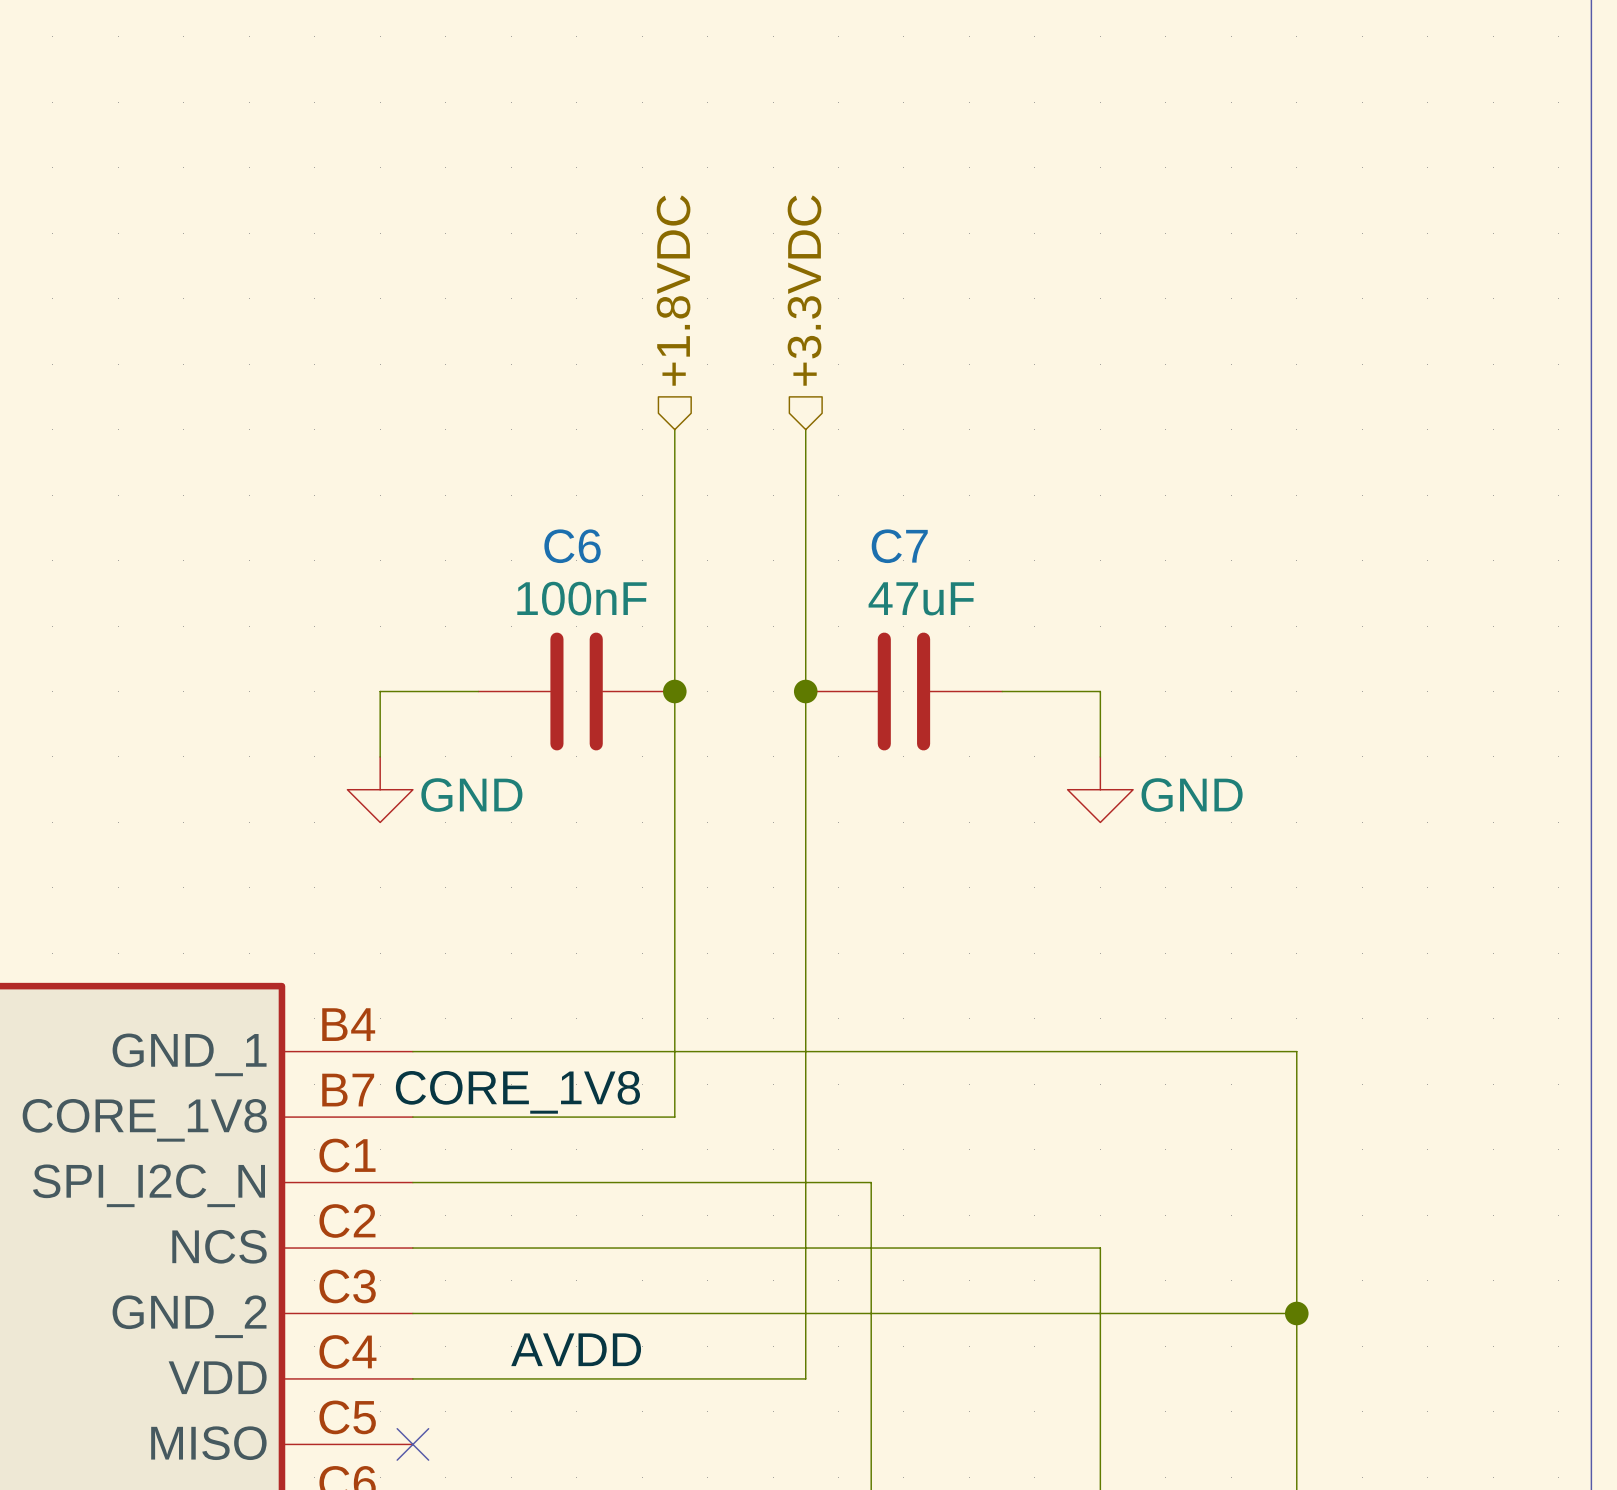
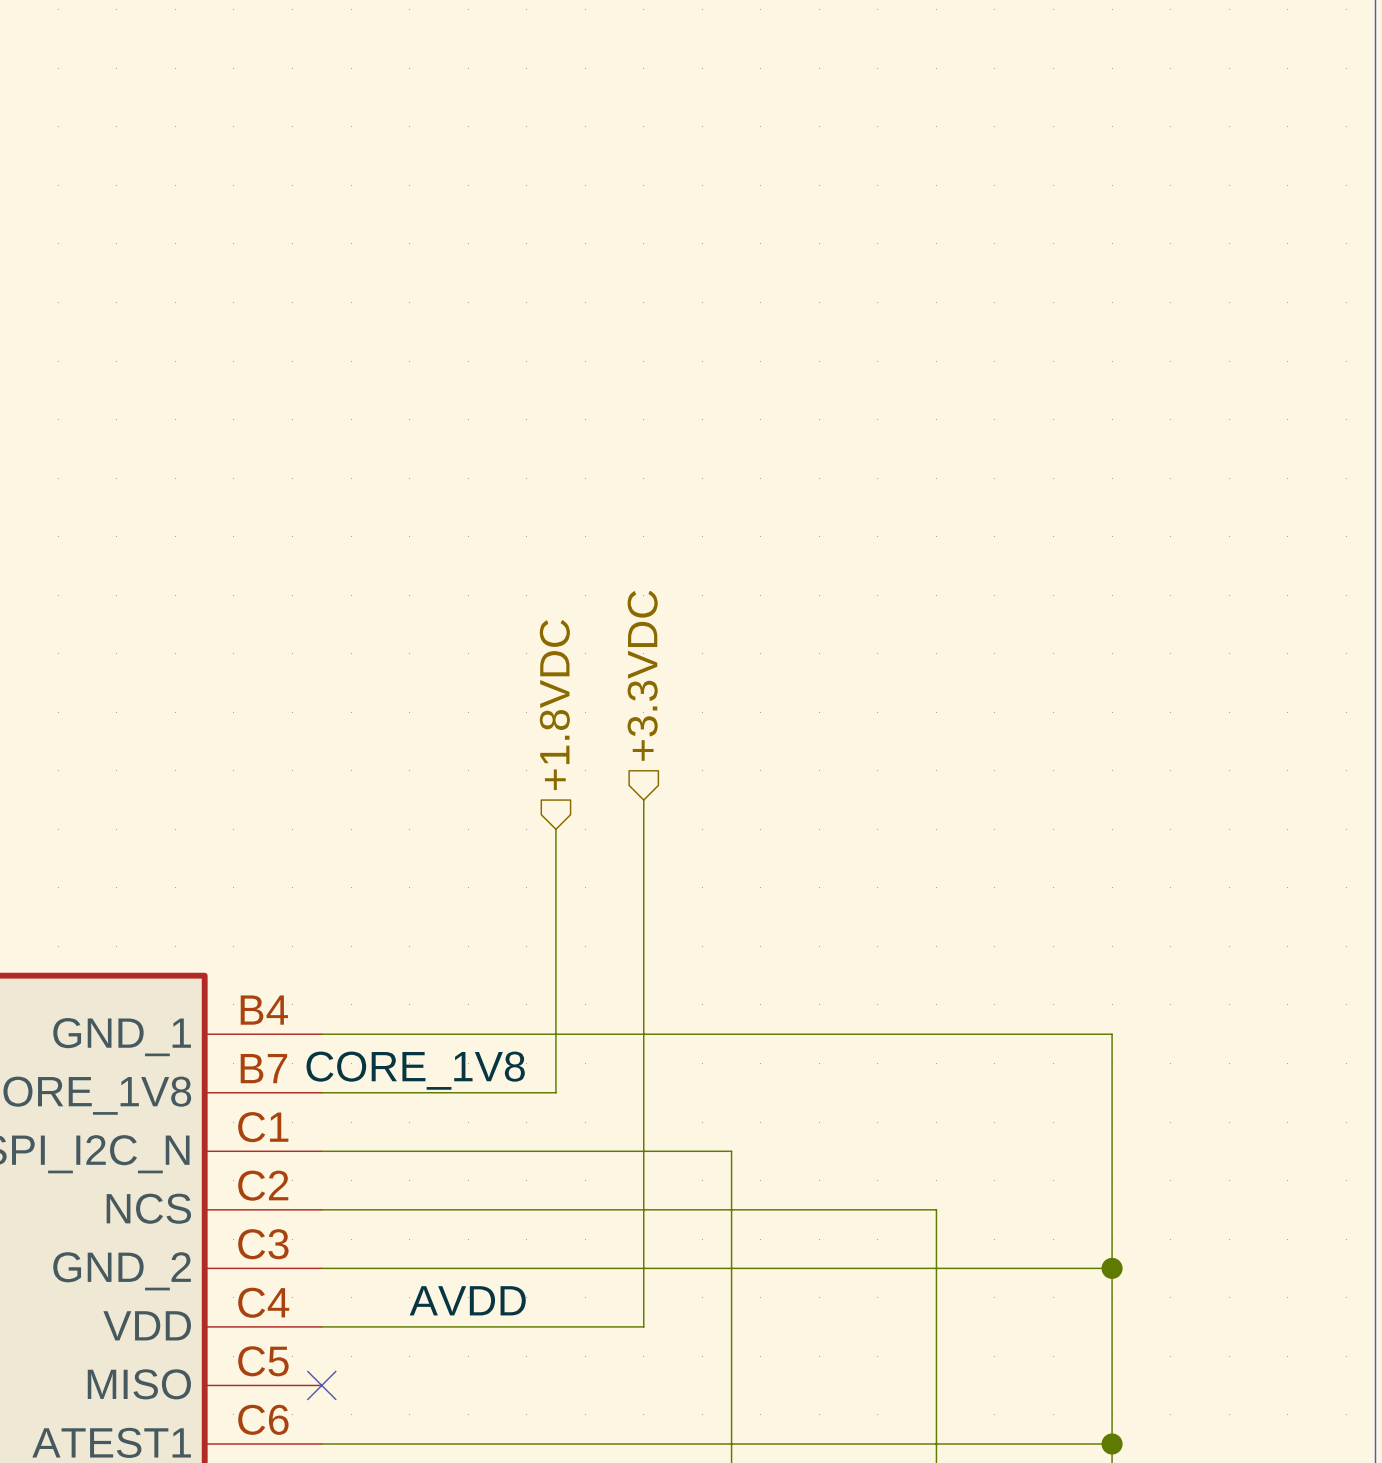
hierarchical label position: +1.8VDC (673, 290) -> +1.8VDC (554, 705)
hierarchical label position: +3.3VDC (804, 290) -> +3.3VDC (642, 675)
wire: (674, 429) (674, 822) -> none
wire: (805, 429) (805, 1378) (773, 1378) -> (643, 800) (643, 1326)
wire: (478, 691) (380, 691) (380, 756) -> none
C6: 100nF (576, 691) -> none
junction: (674, 691) -> none
junction: (805, 691) -> none
C7: 47uF (903, 691) -> none
wire: (1002, 691) (1100, 691) (1100, 756) -> none
power symbol: GND (380, 789) -> none
power symbol: GND (1100, 789) -> none

